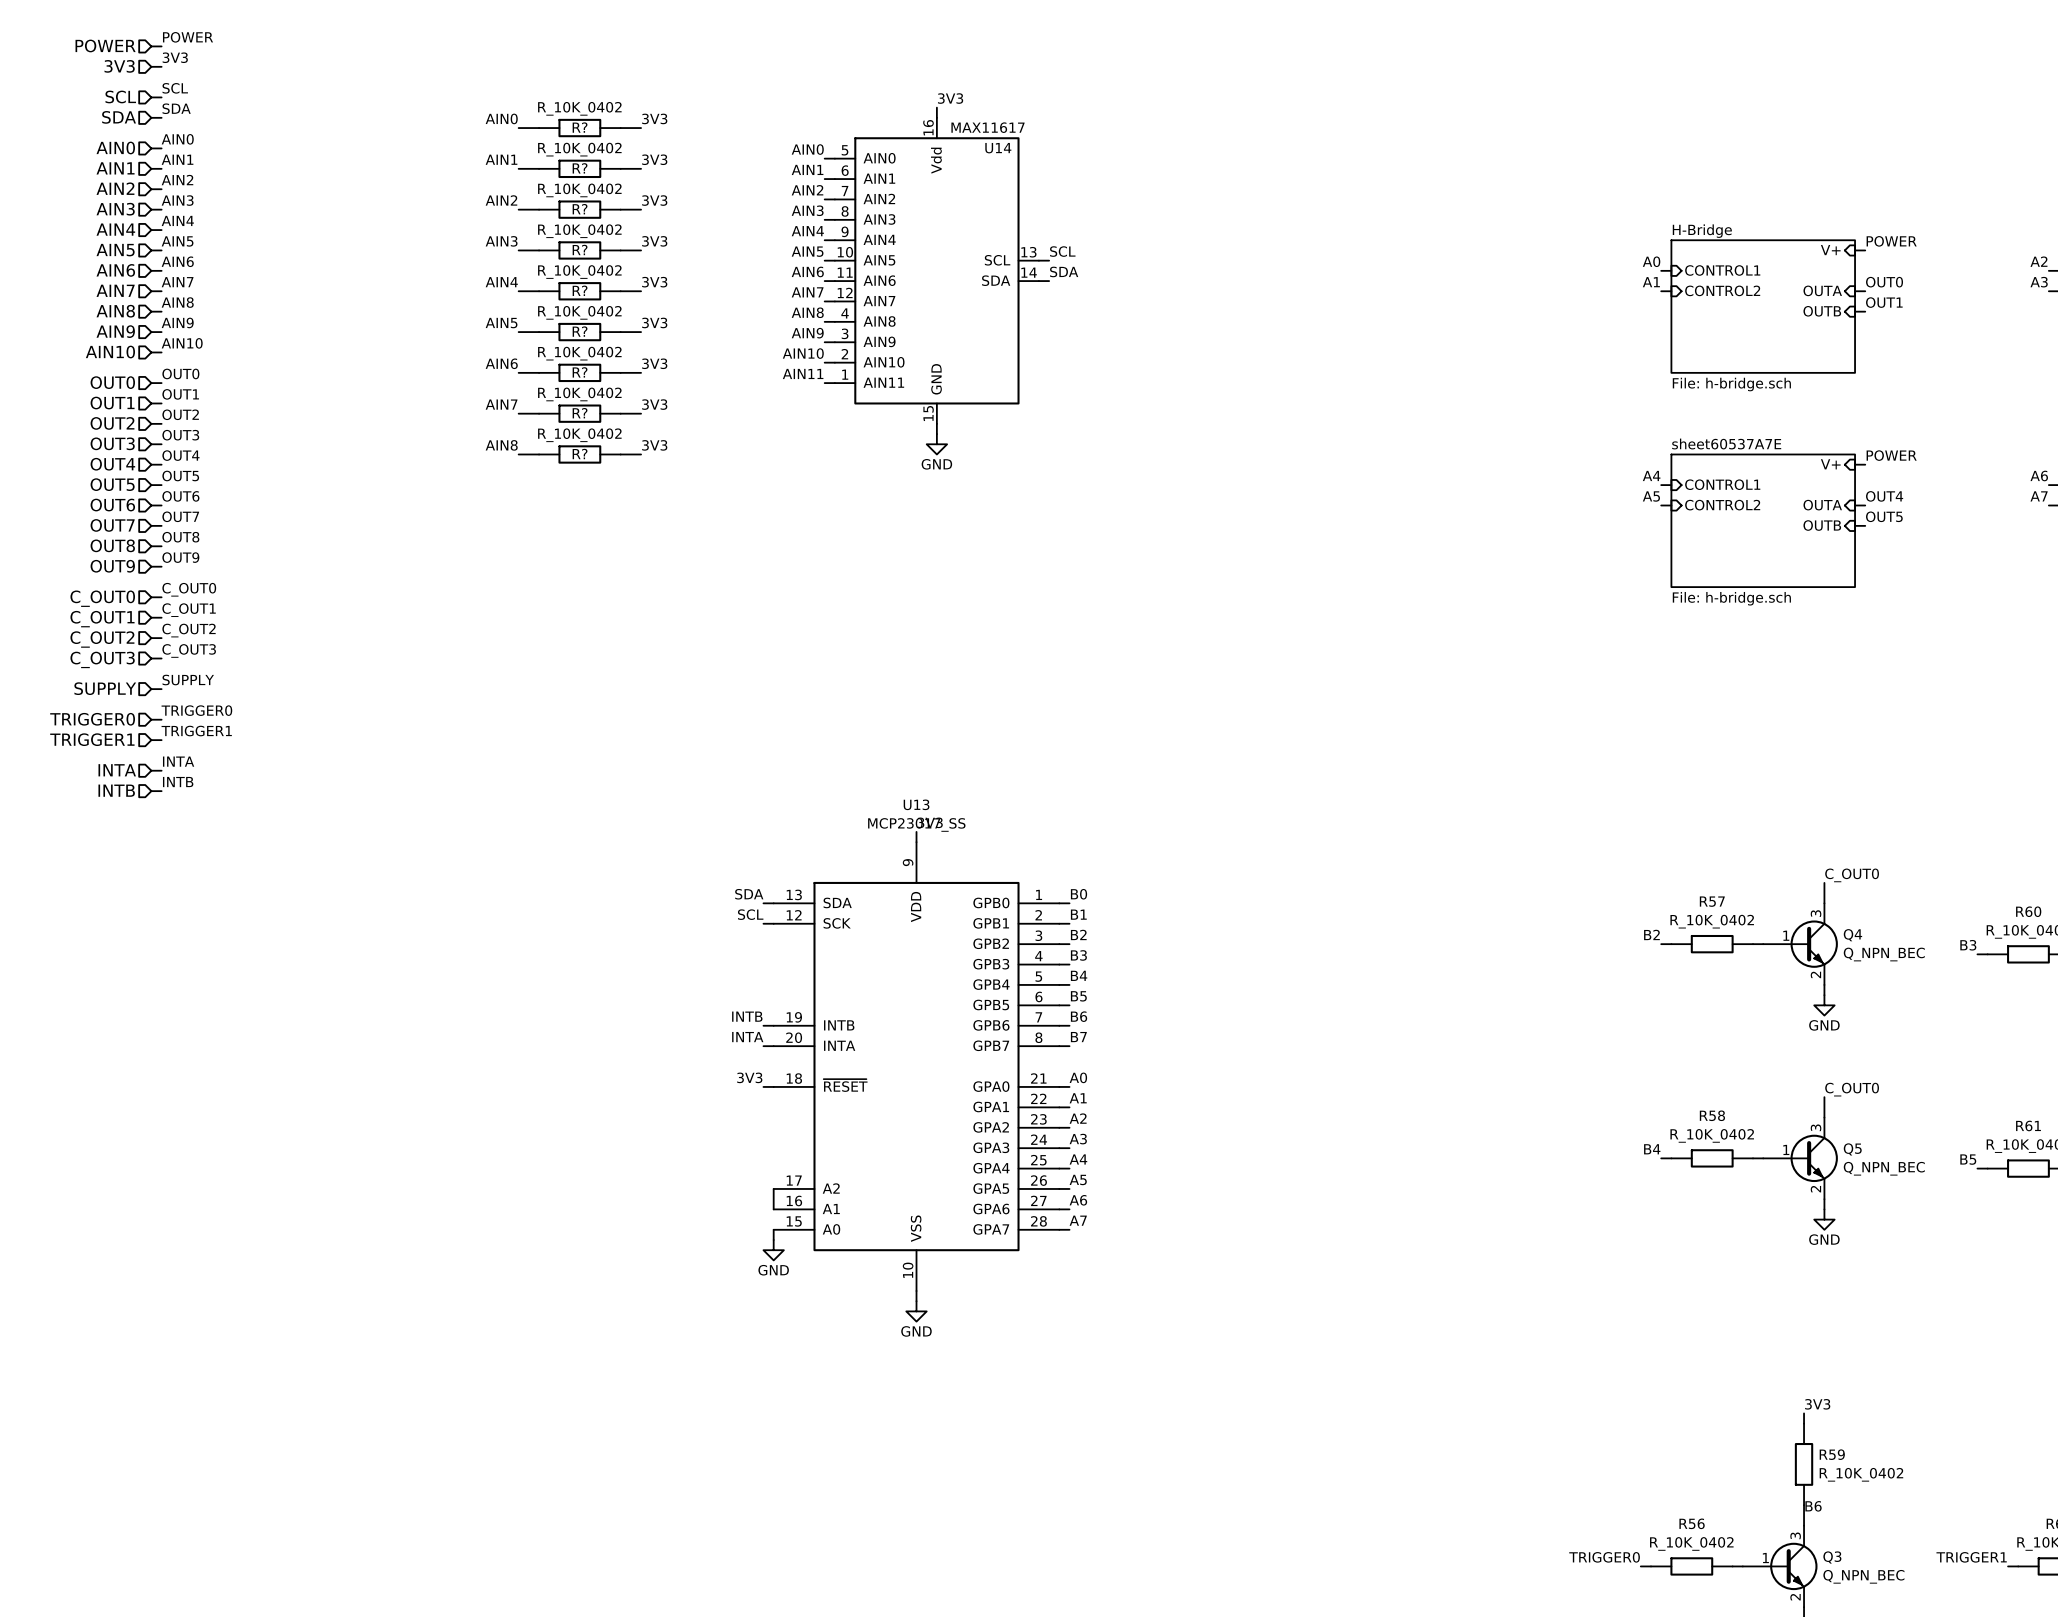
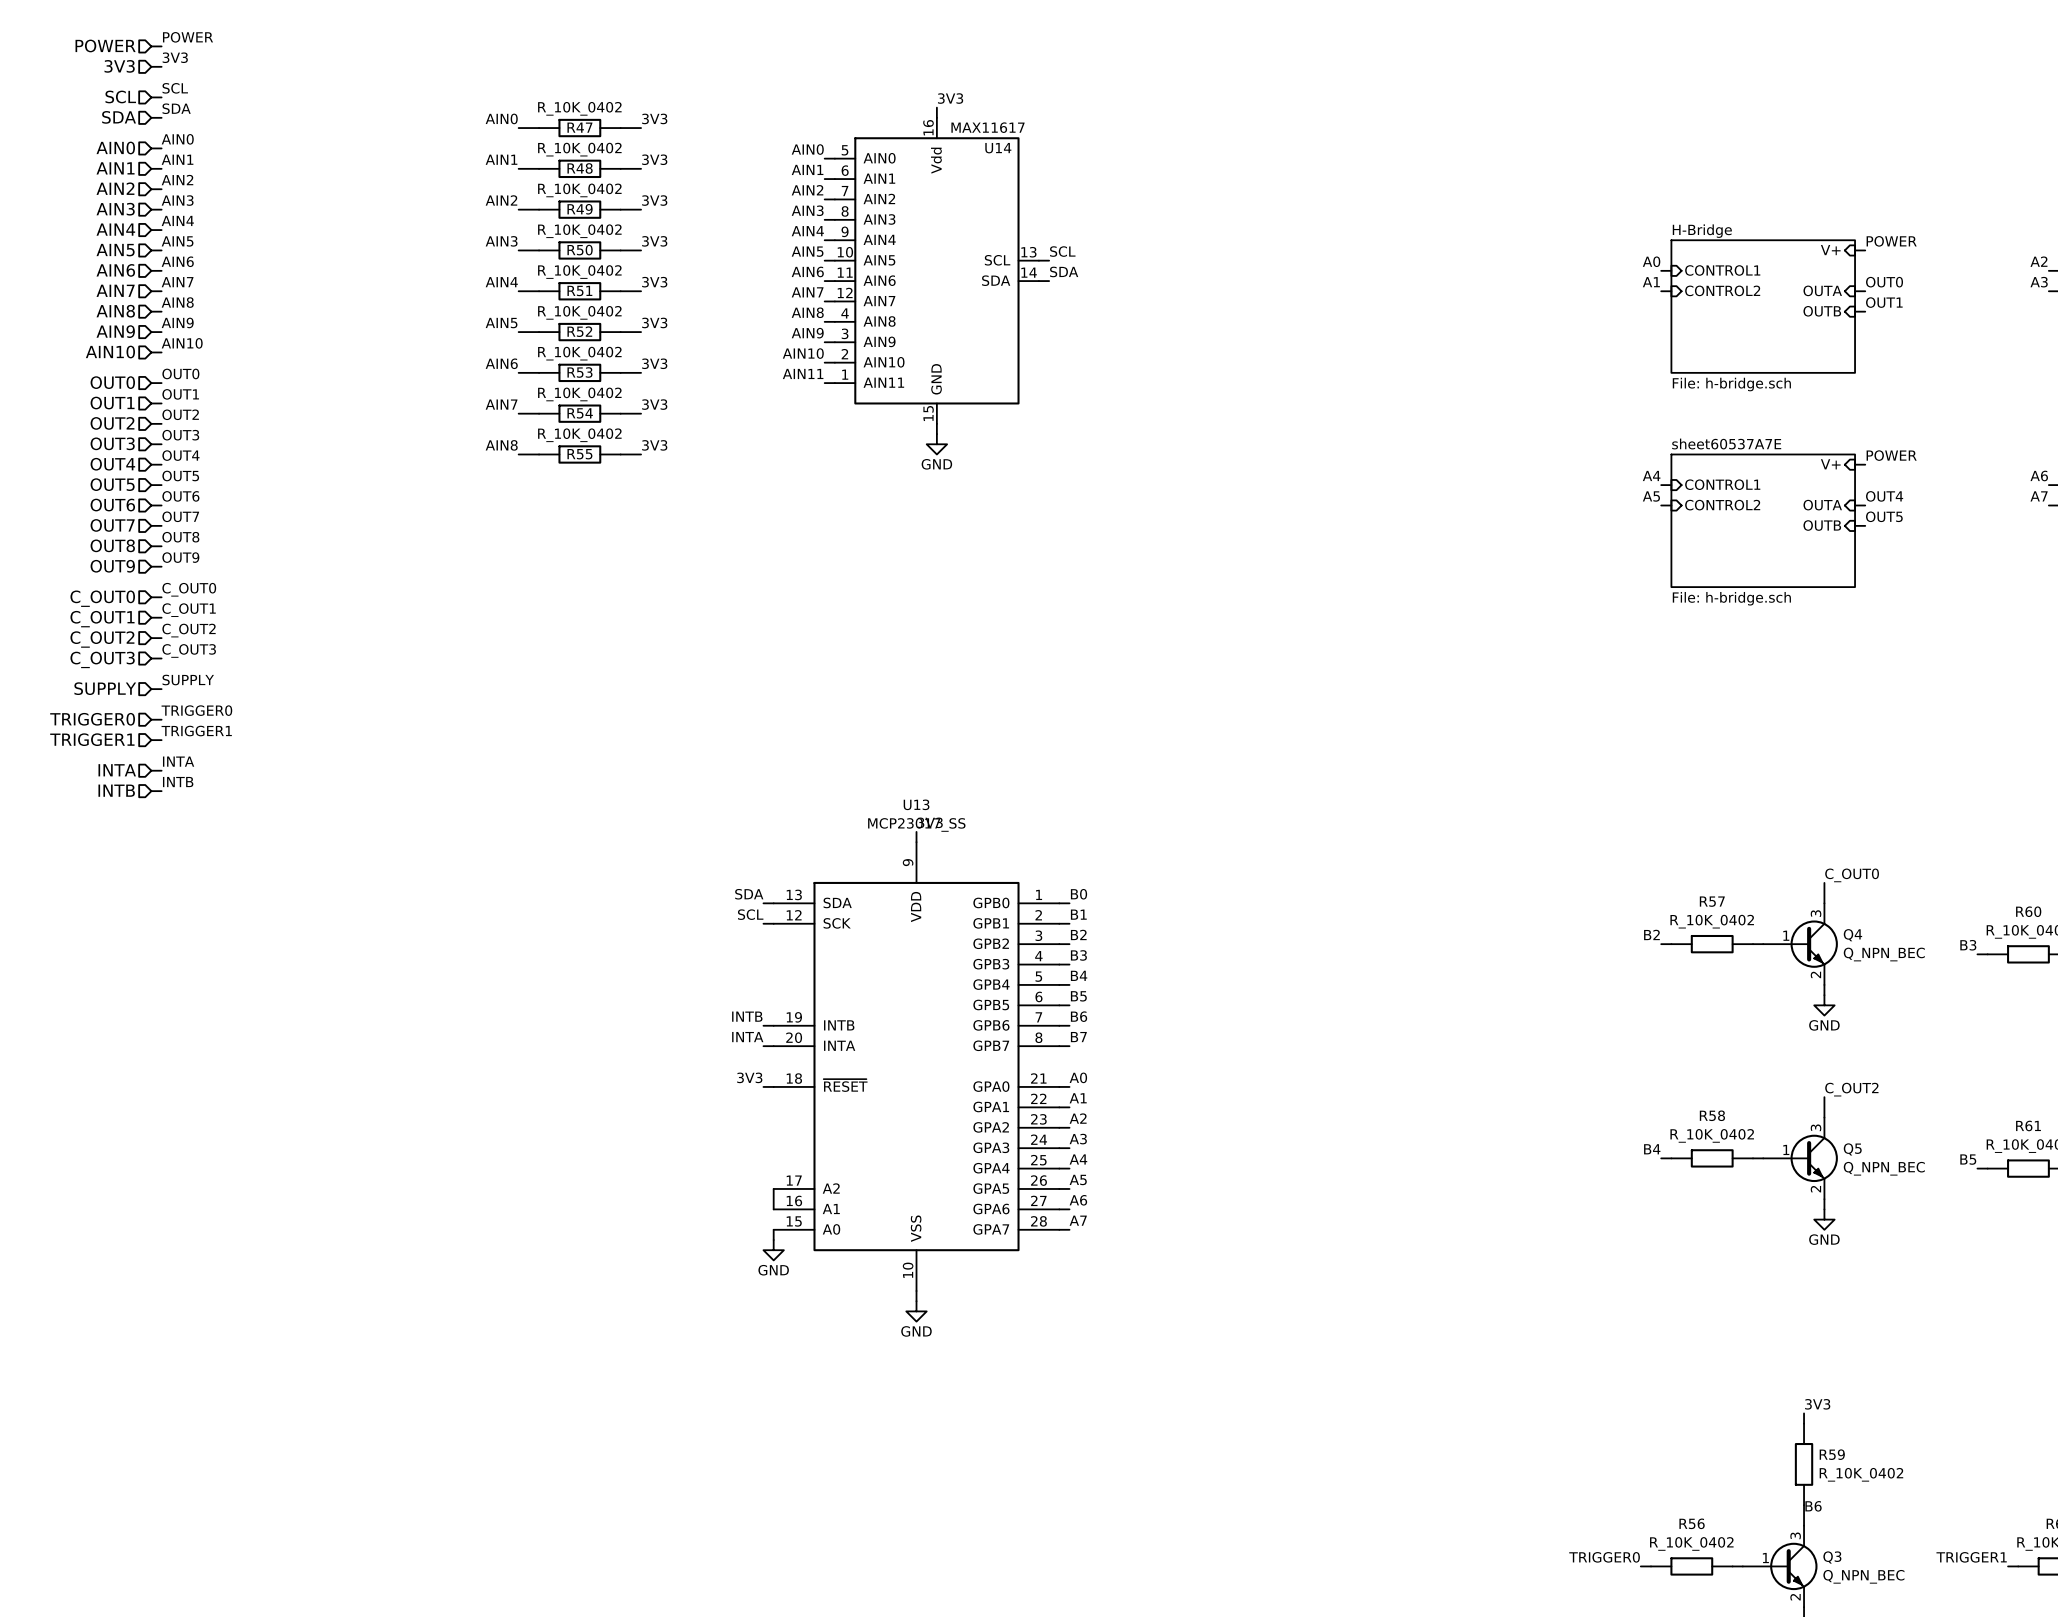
R? name: R? (580, 127) -> R47 (579, 127)
R? name: R? (580, 168) -> R48 (580, 168)
R? name: R? (580, 209) -> R49 (580, 209)
R? name: R? (580, 249) -> R50 (580, 250)
R? name: R? (580, 290) -> R51 (579, 290)
R? name: R? (580, 331) -> R52 (579, 331)
R? name: R? (580, 372) -> R53 (579, 372)
R? name: R? (580, 413) -> R54 (580, 413)
R? name: R? (580, 454) -> R55 (579, 454)
label: C_OUT0 (1852, 1089) -> C_OUT2 (1851, 1089)

